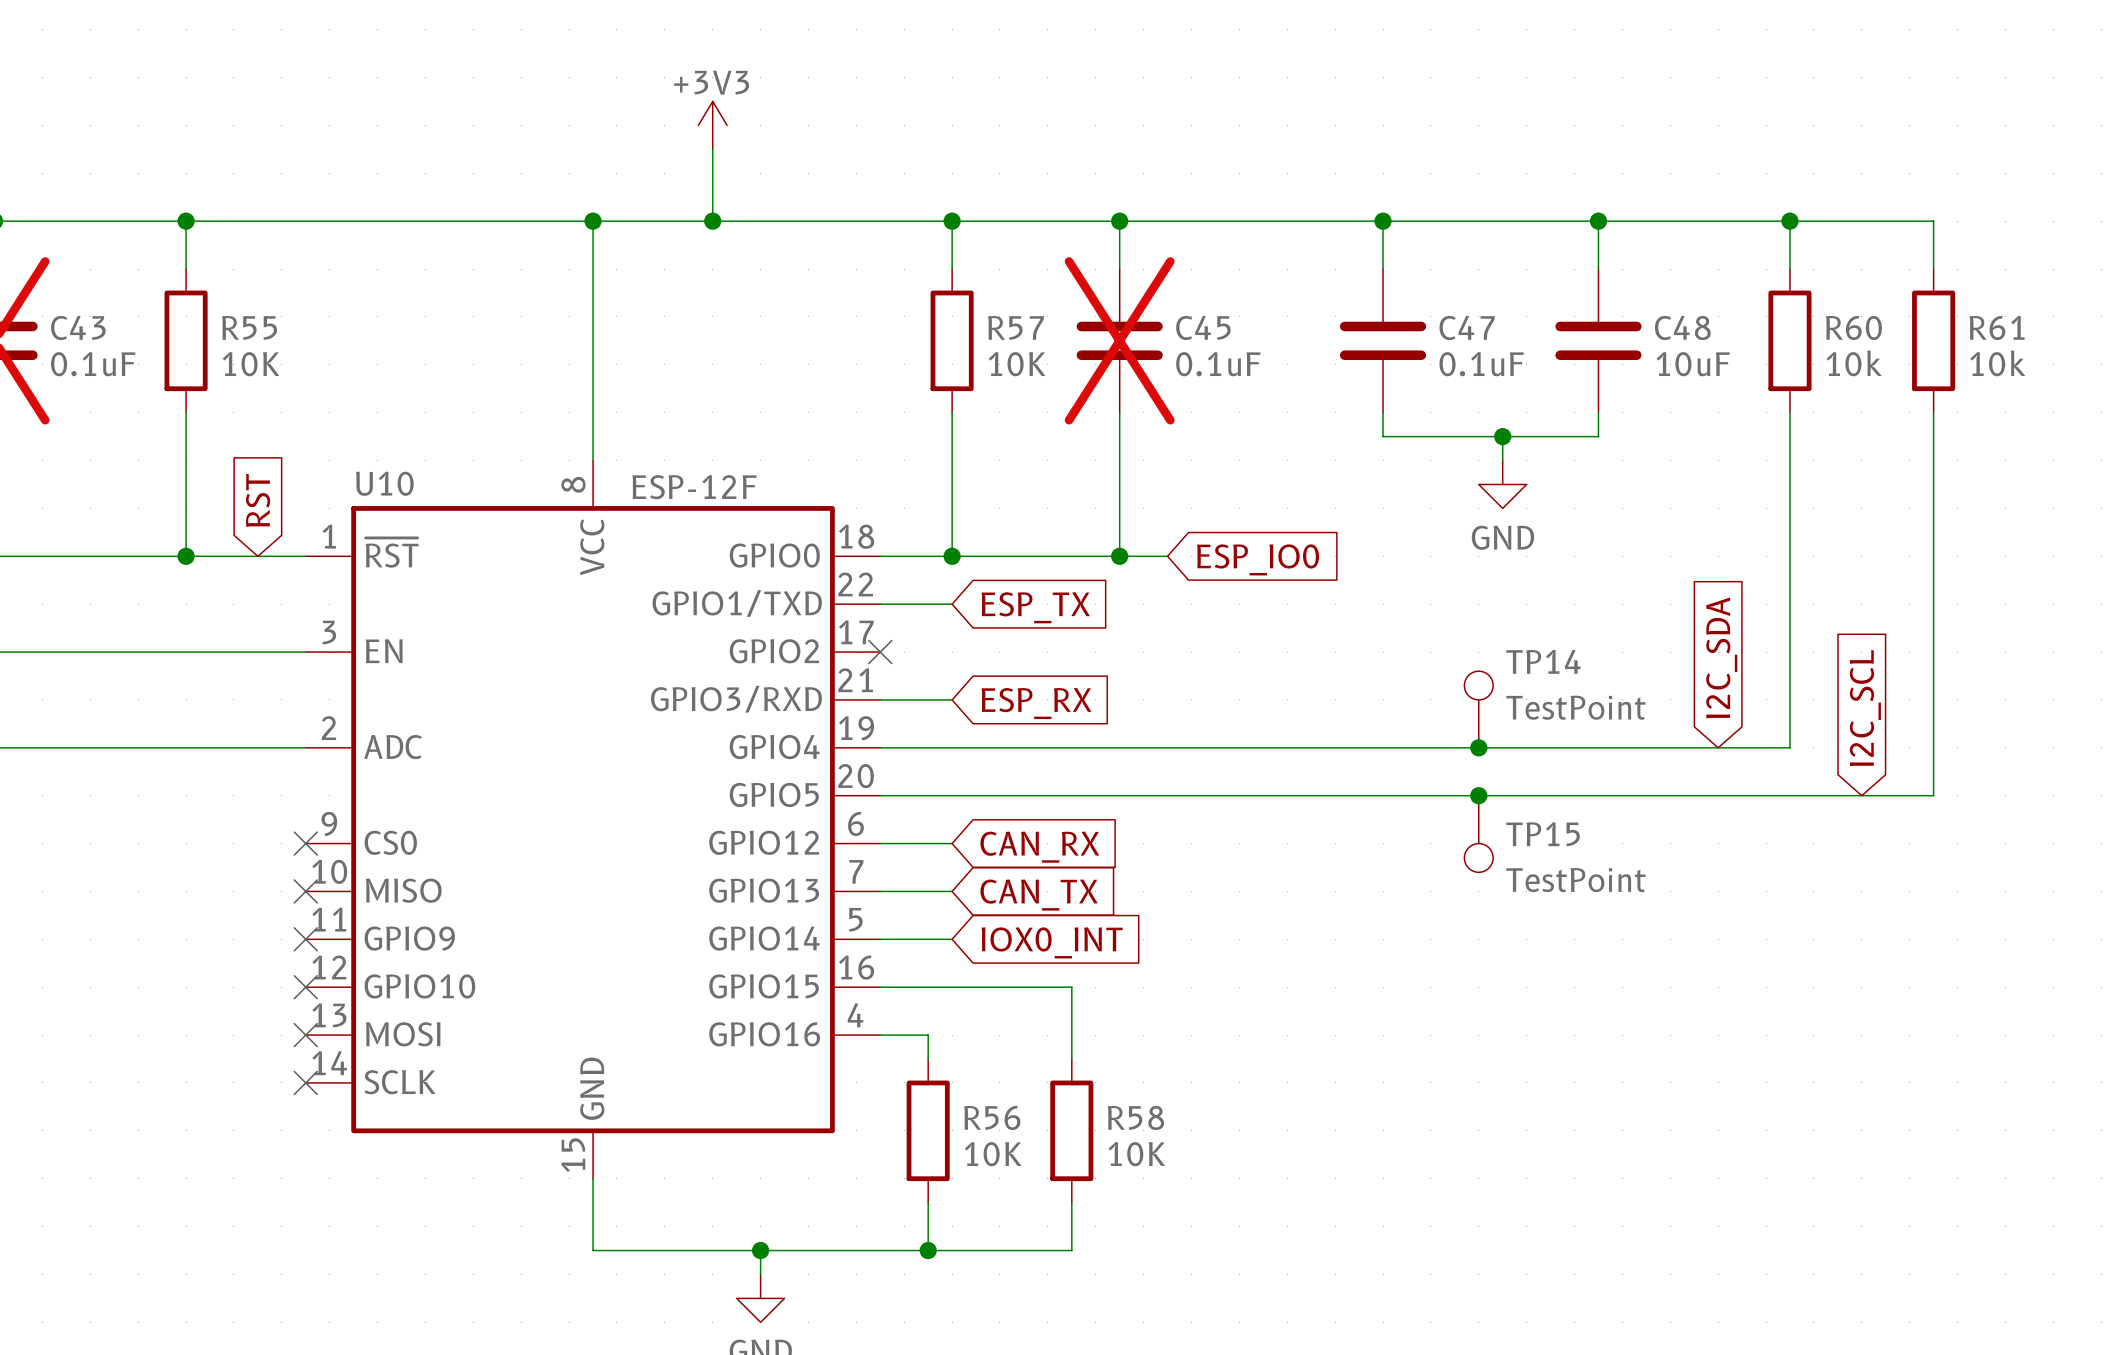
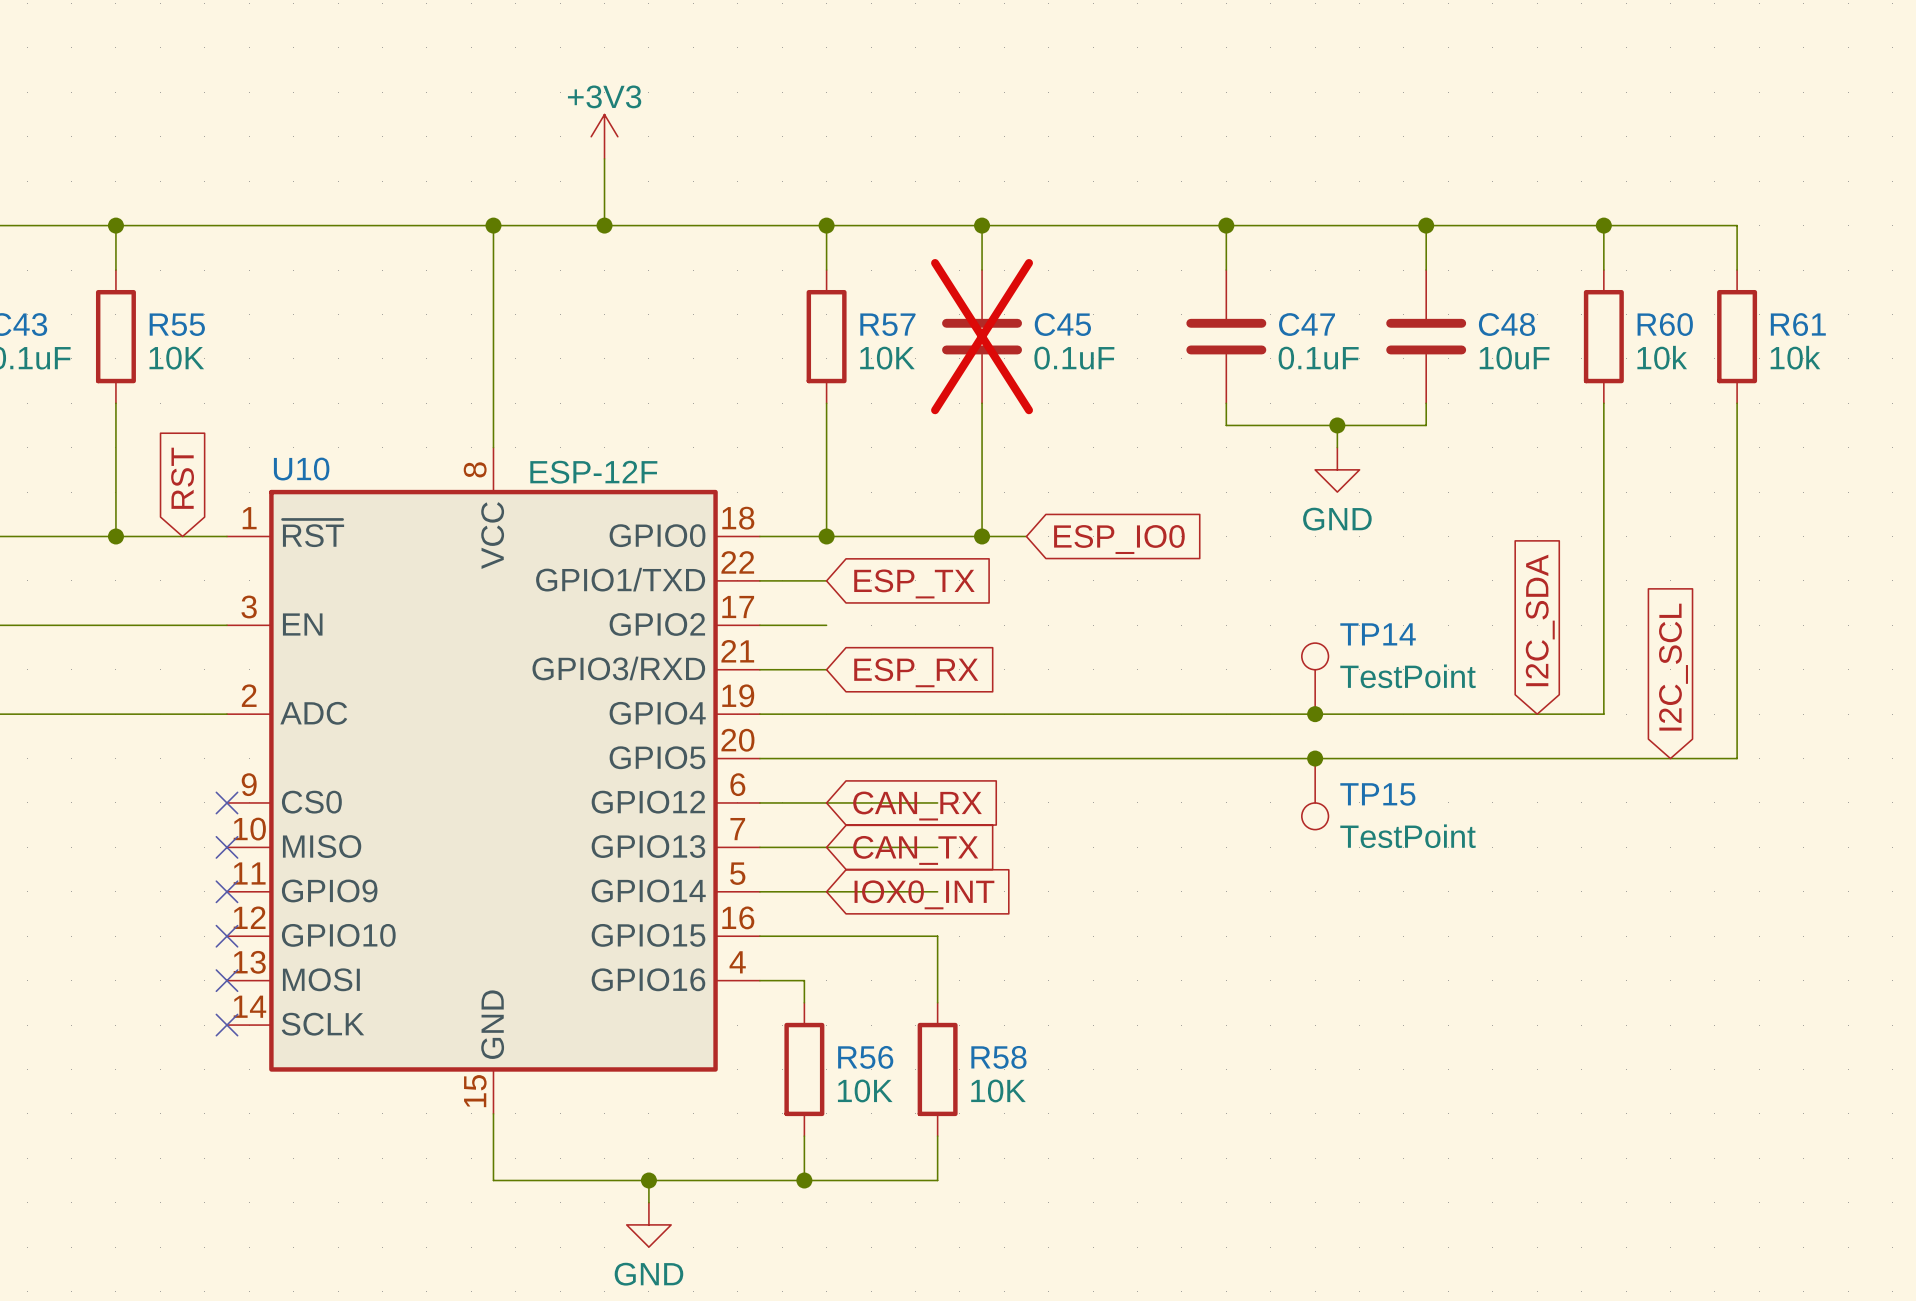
wire: none -> (759, 625) (826, 625)
no-connect mark: (880, 652) -> none
wire: none -> (826, 802) (937, 802)
wire: none -> (826, 847) (937, 847)
wire: none -> (826, 891) (937, 891)

